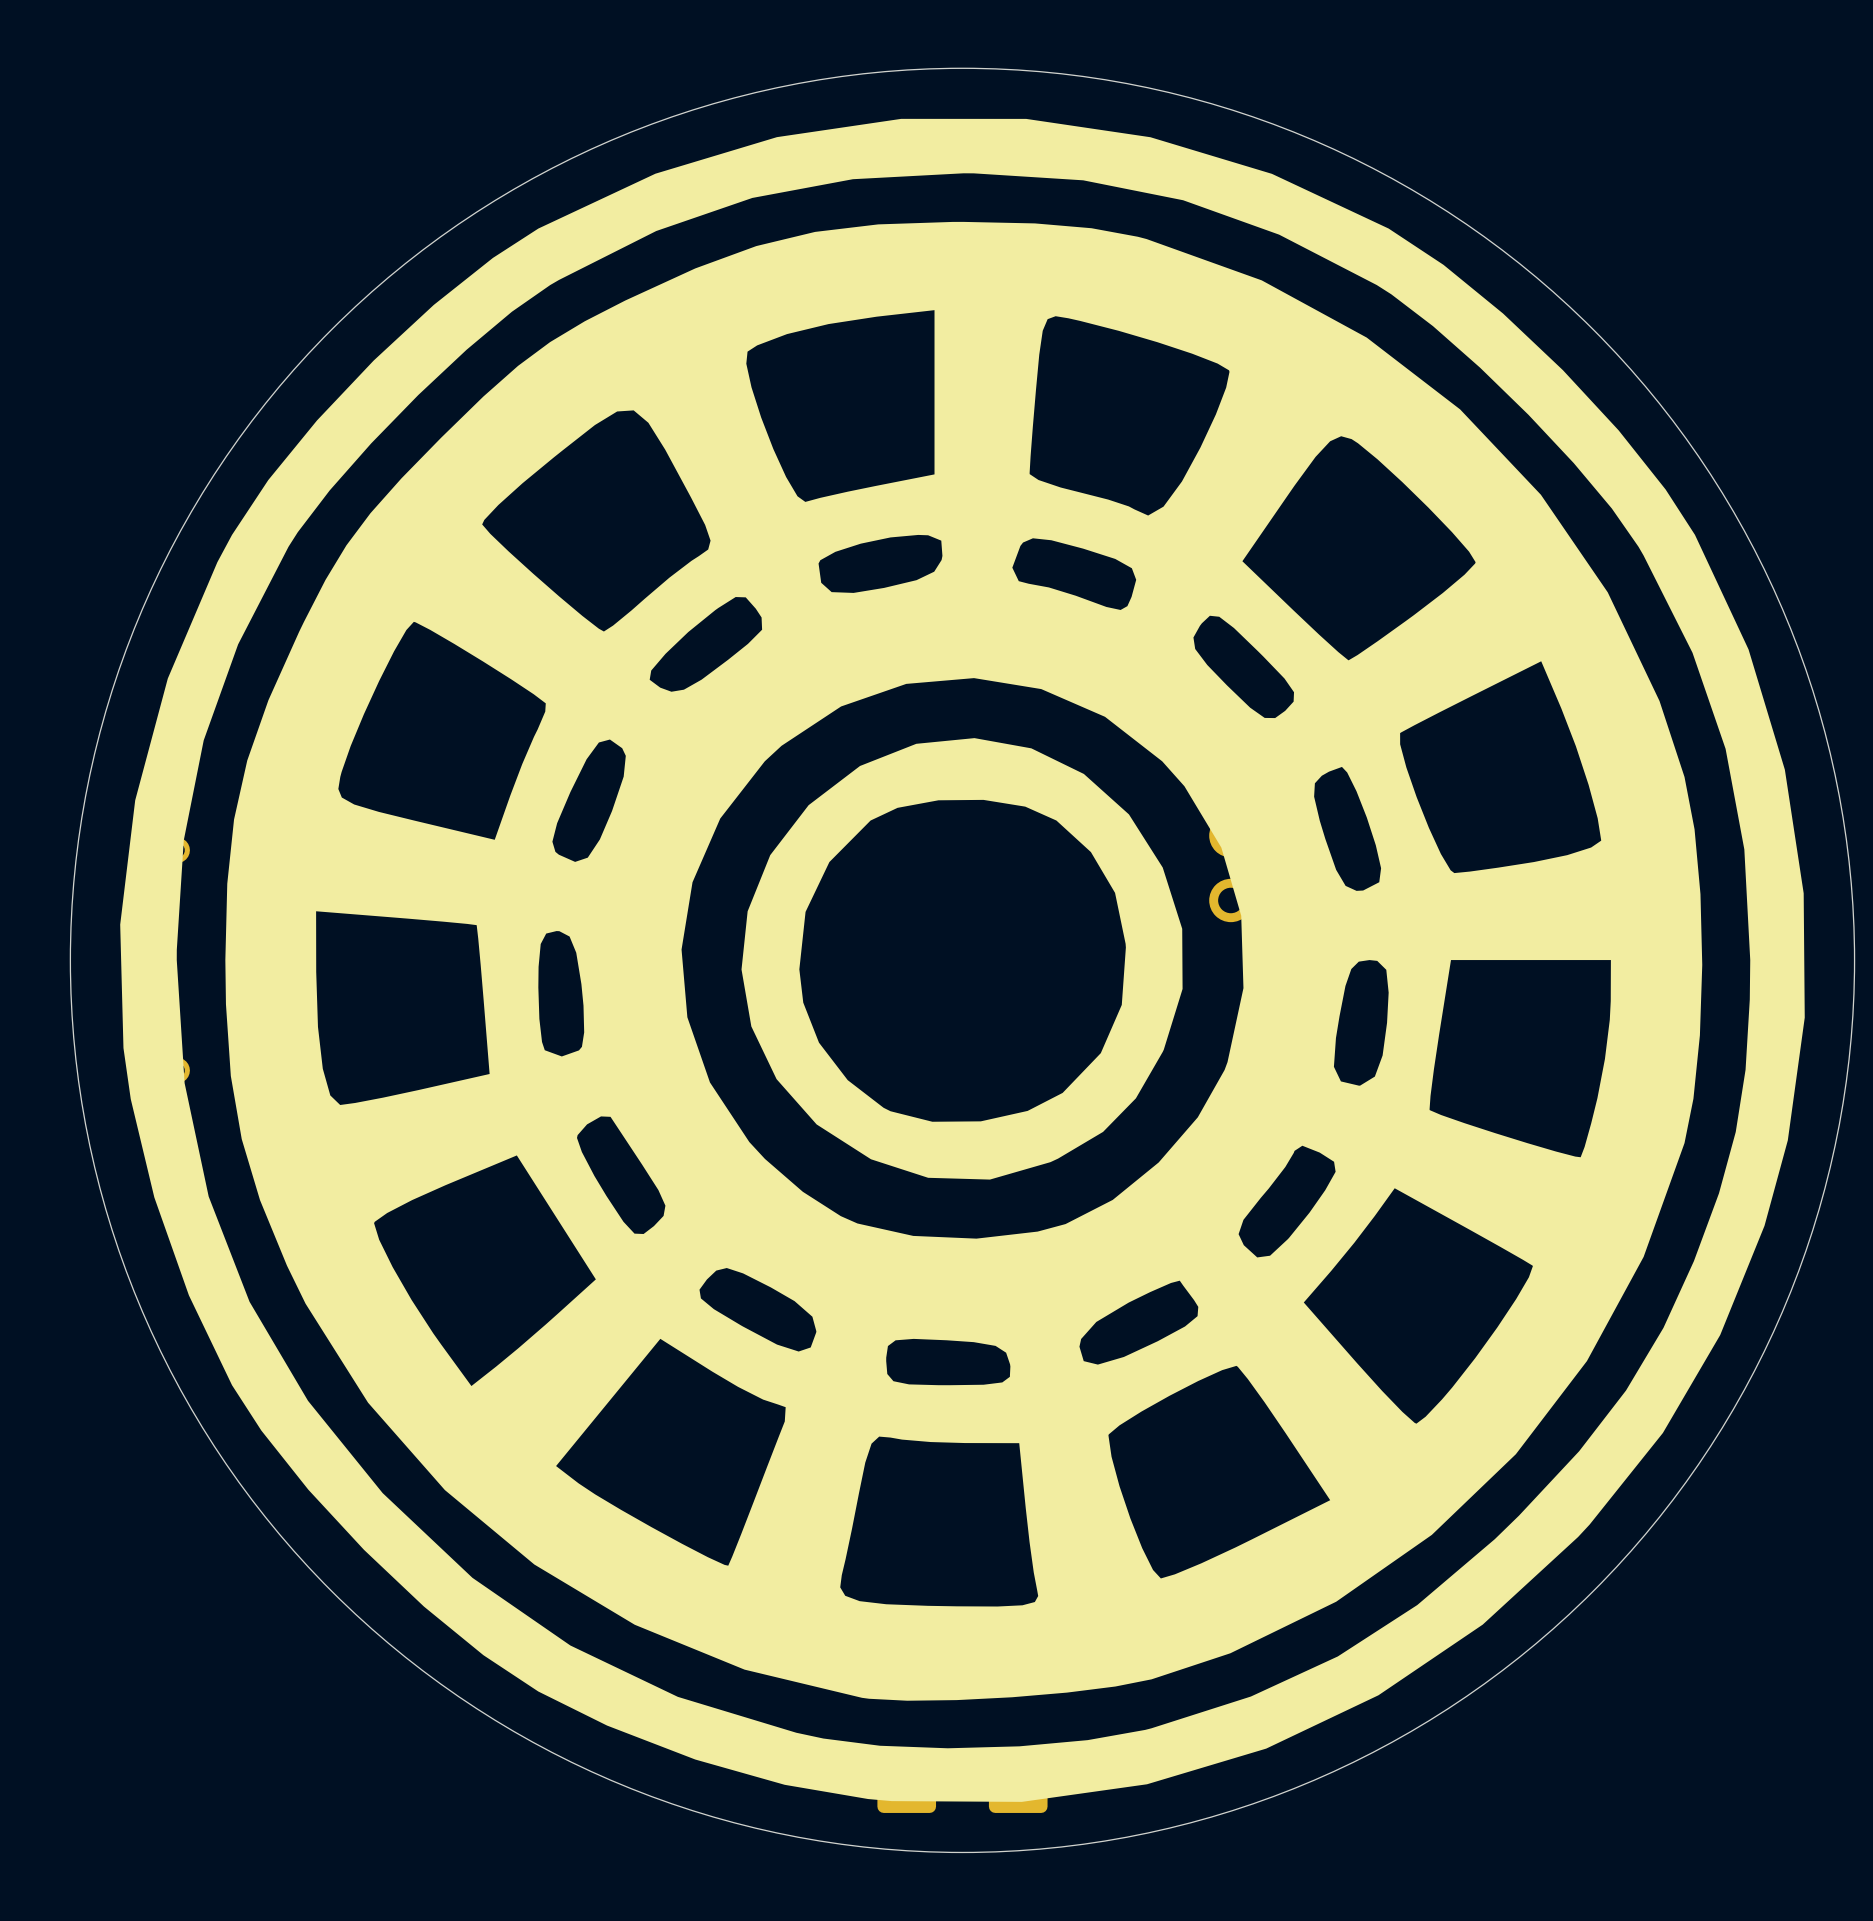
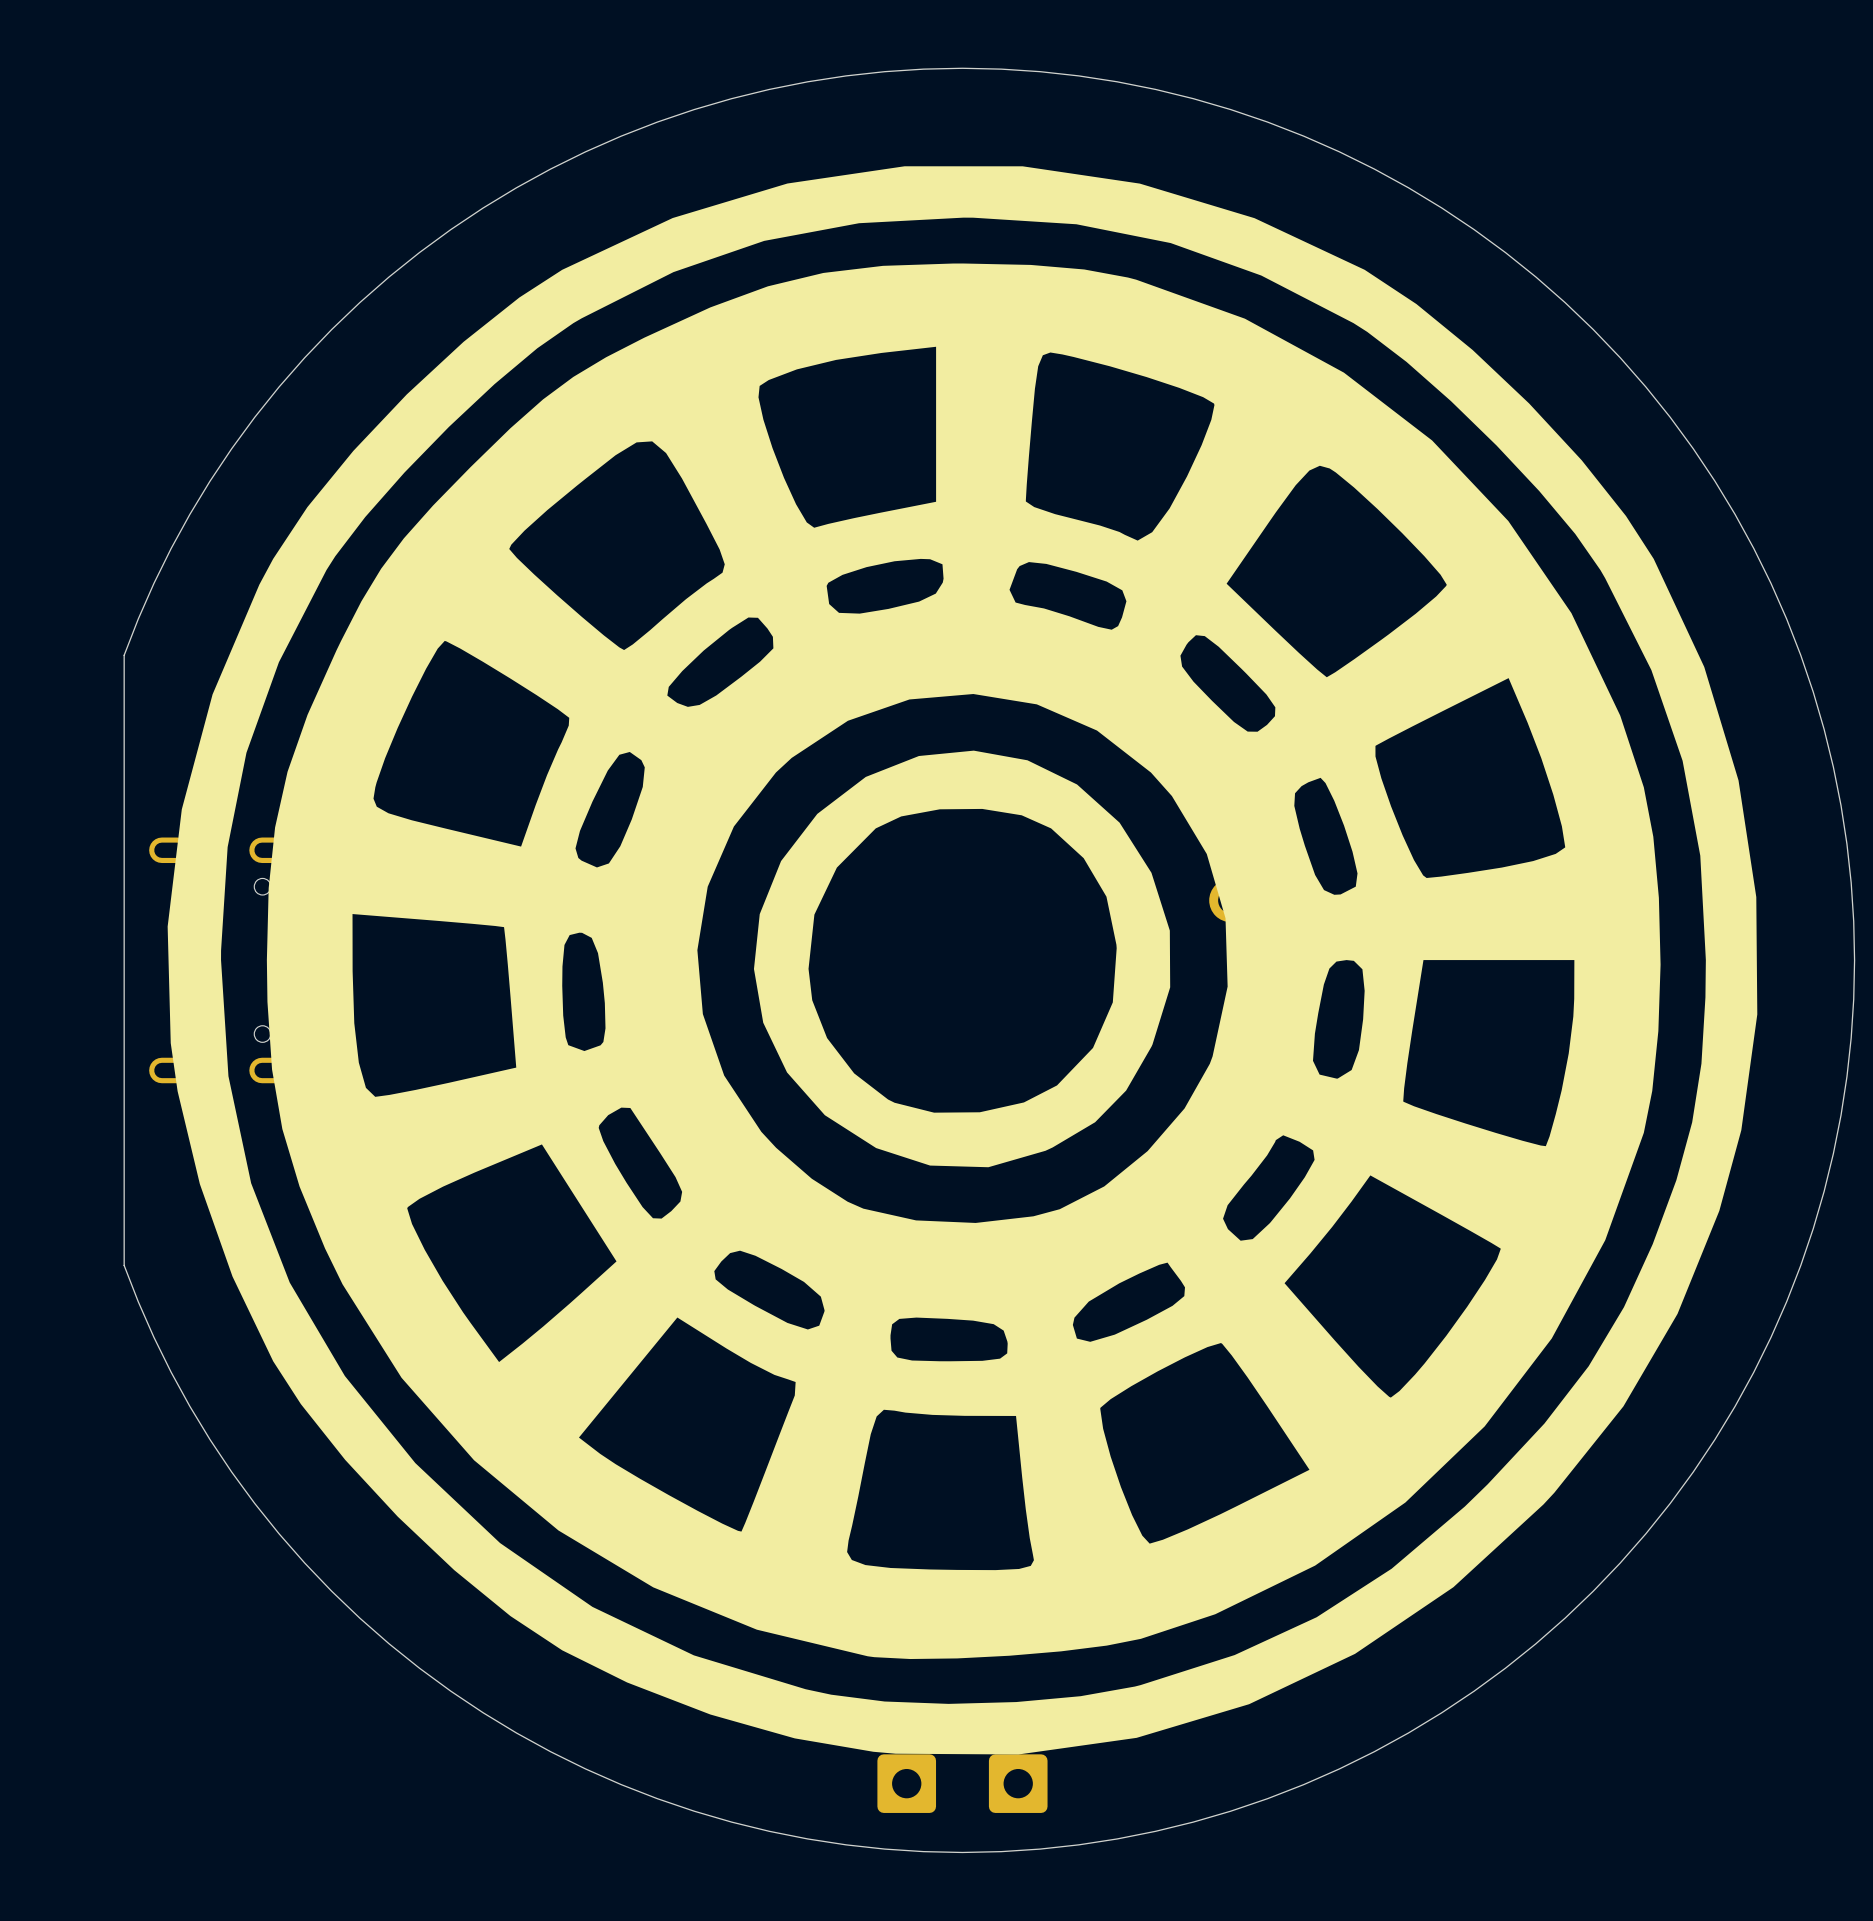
round board edge: [69, 67, 1856, 1854] -> none
drawing shape: [120, 118, 1805, 1802] -> [167, 166, 1758, 1755]
board edge: none -> (124, 655) (124, 1265) (153, 1337) (189, 1406) (210, 1439) (254, 1503) (304, 1563) (359, 1618) (419, 1668) (483, 1712) (516, 1732) (585, 1768) (657, 1798) (731, 1822) (807, 1838) (884, 1849) (923, 1851) (1001, 1851) (1078, 1844) (1155, 1831) (1230, 1811) (1267, 1798) (1339, 1768) (1408, 1732) (1474, 1691) (1535, 1643) (1565, 1618) (1620, 1563) (1670, 1503) (1714, 1439) (1753, 1372) (1770, 1337) (1800, 1265) (1824, 1191) (1841, 1115) (1851, 1038) (1853, 999) (1853, 921) (1846, 843) (1833, 767) (1813, 692) (1786, 618) (1770, 583) (1735, 514) (1693, 448) (1645, 386) (1620, 357) (1565, 302) (1505, 252) (1474, 229) (1408, 187) (1339, 151) (1267, 122) (1193, 98) (1117, 81) (1078, 75) (1001, 69) (923, 69) (846, 75) (769, 89) (694, 109) (621, 136) (585, 151) (516, 187) (450, 229) (389, 277) (359, 302) (304, 357) (254, 417) (210, 481) (171, 548) (138, 619) (124, 655)

